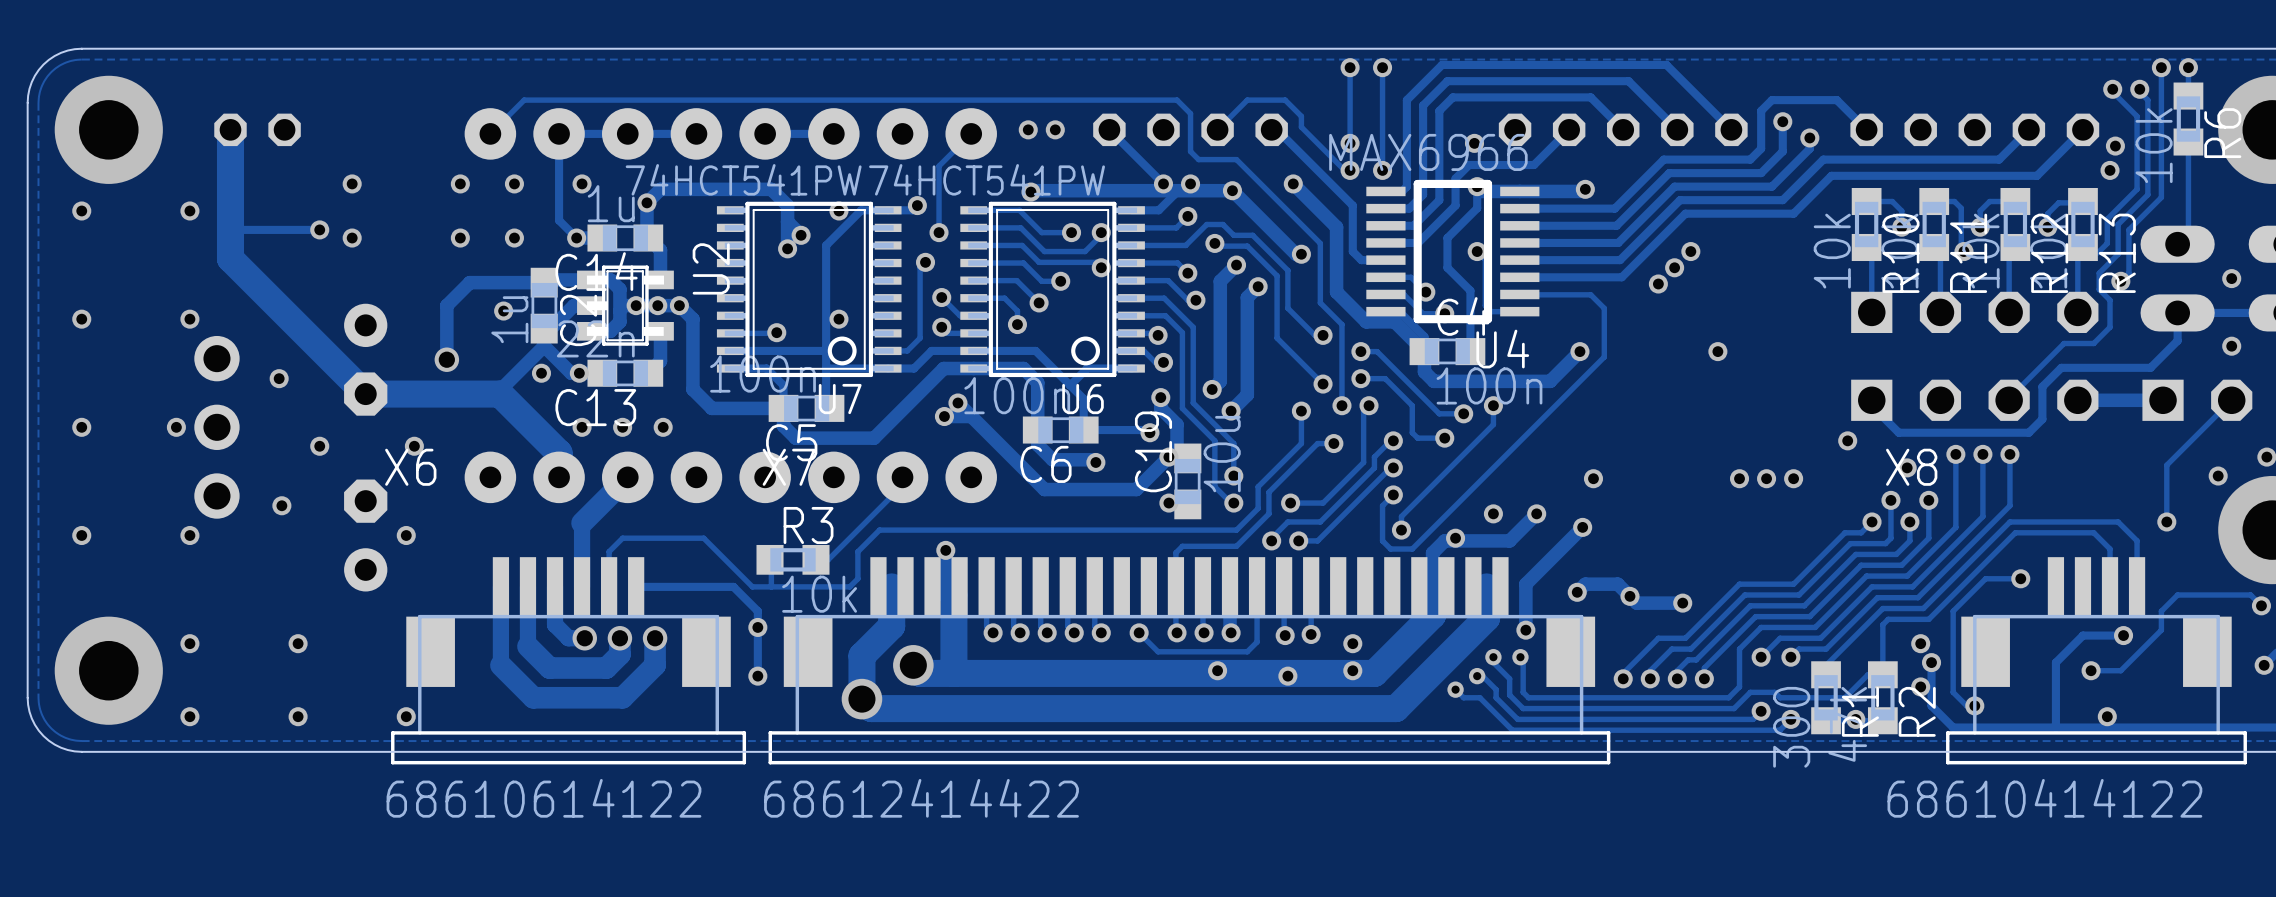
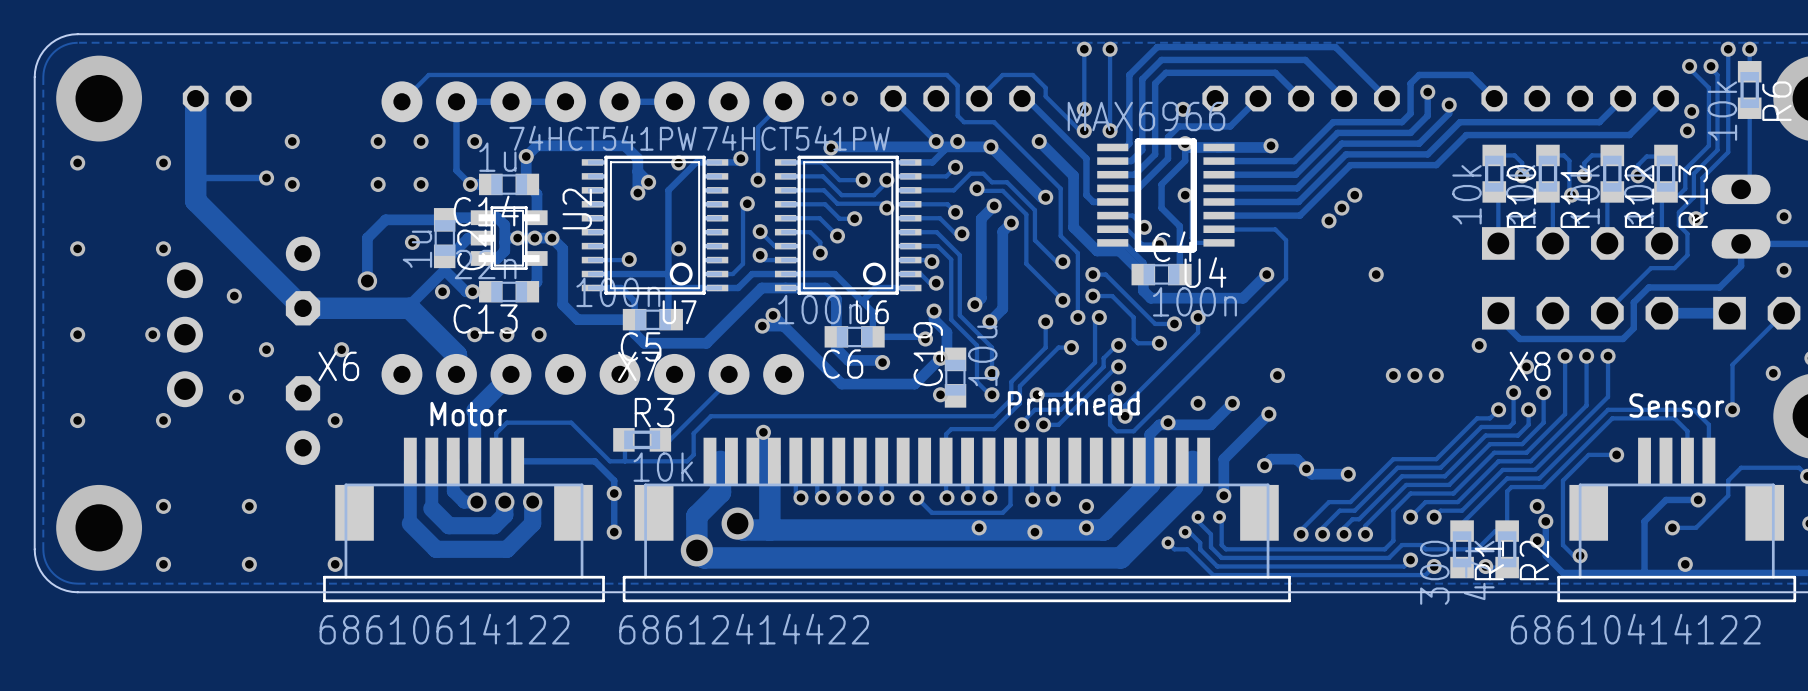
text: none -> Printhead (1073, 403)
text: none -> Sensor (1676, 405)
text: none -> Motor (468, 414)

